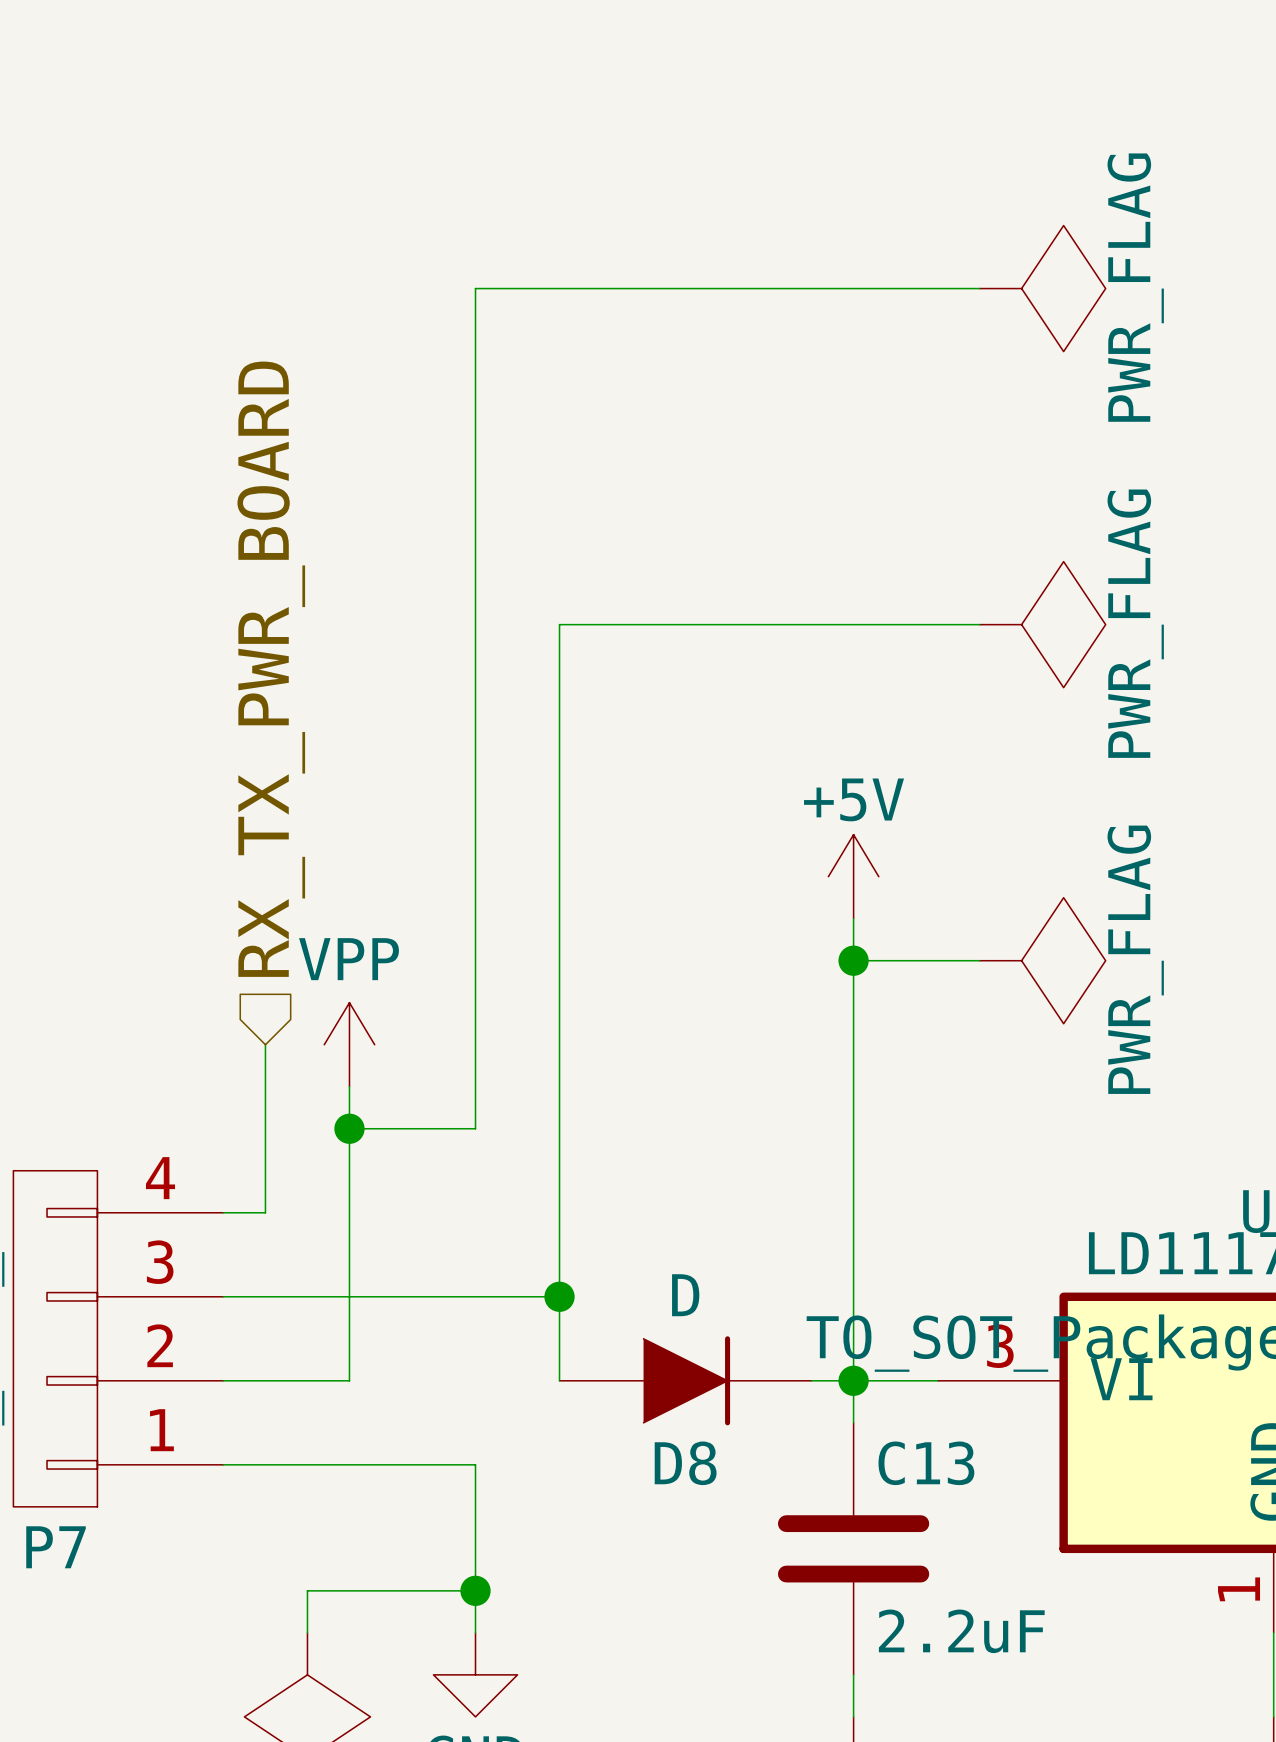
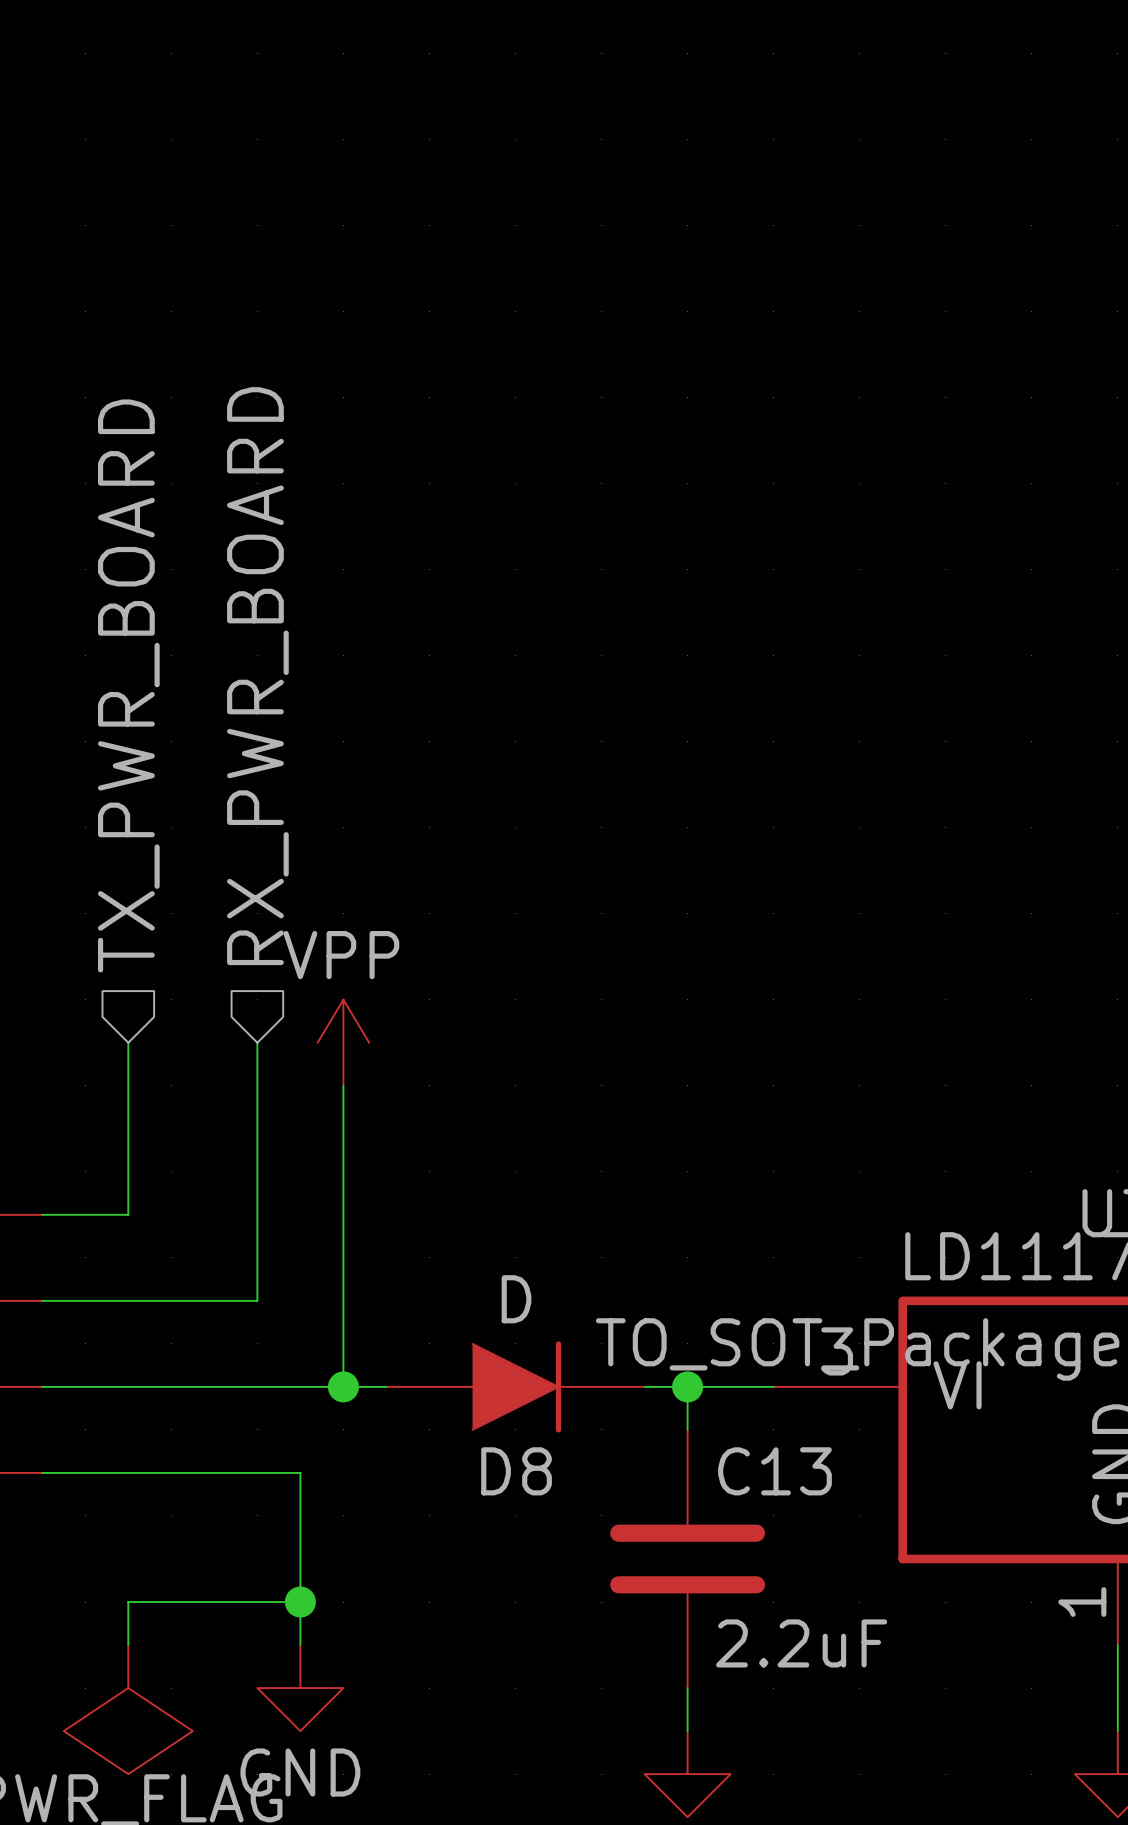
wire: (979, 288) (475, 288) (475, 1128) (349, 1128) -> none
power symbol: PWR_FLAG (1042, 288) -> none
wire: (979, 624) (559, 624) (559, 1380) -> none
power symbol: PWR_FLAG (1042, 624) -> none
hierarchical label: RX_TX_PWR_BOARD (271, 669) -> TX_PWR_BOARD (128, 685)
hierarchical label: none -> RX_PWR_BOARD (257, 676)
power symbol: +5V (853, 876) -> none
wire: (853, 918) (853, 1380) -> none
wire: (853, 960) (979, 960) -> none
junction: (853, 960) -> none
power symbol: PWR_FLAG (1042, 960) -> none
wire: (265, 1044) (265, 1212) -> (128, 1042) (128, 1214) (85, 1214)
power symbol position: VPP (349, 1044) -> VPP (343, 1042)
wire: (349, 1086) (349, 1380) -> (386, 1386) (171, 1386)
wire: none -> (343, 1085) (343, 1386)
junction: (349, 1128) -> none
wire: (433, 1296) (559, 1296) -> (257, 1300) (257, 1042)
junction position: (559, 1296) -> (343, 1386)

